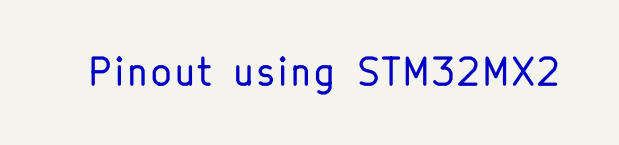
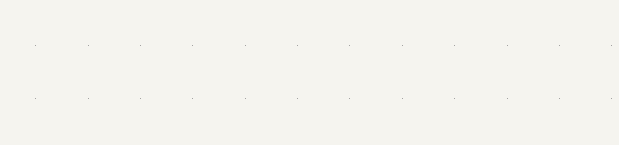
text: Pinout using STM32MX2 (324, 75) -> none

